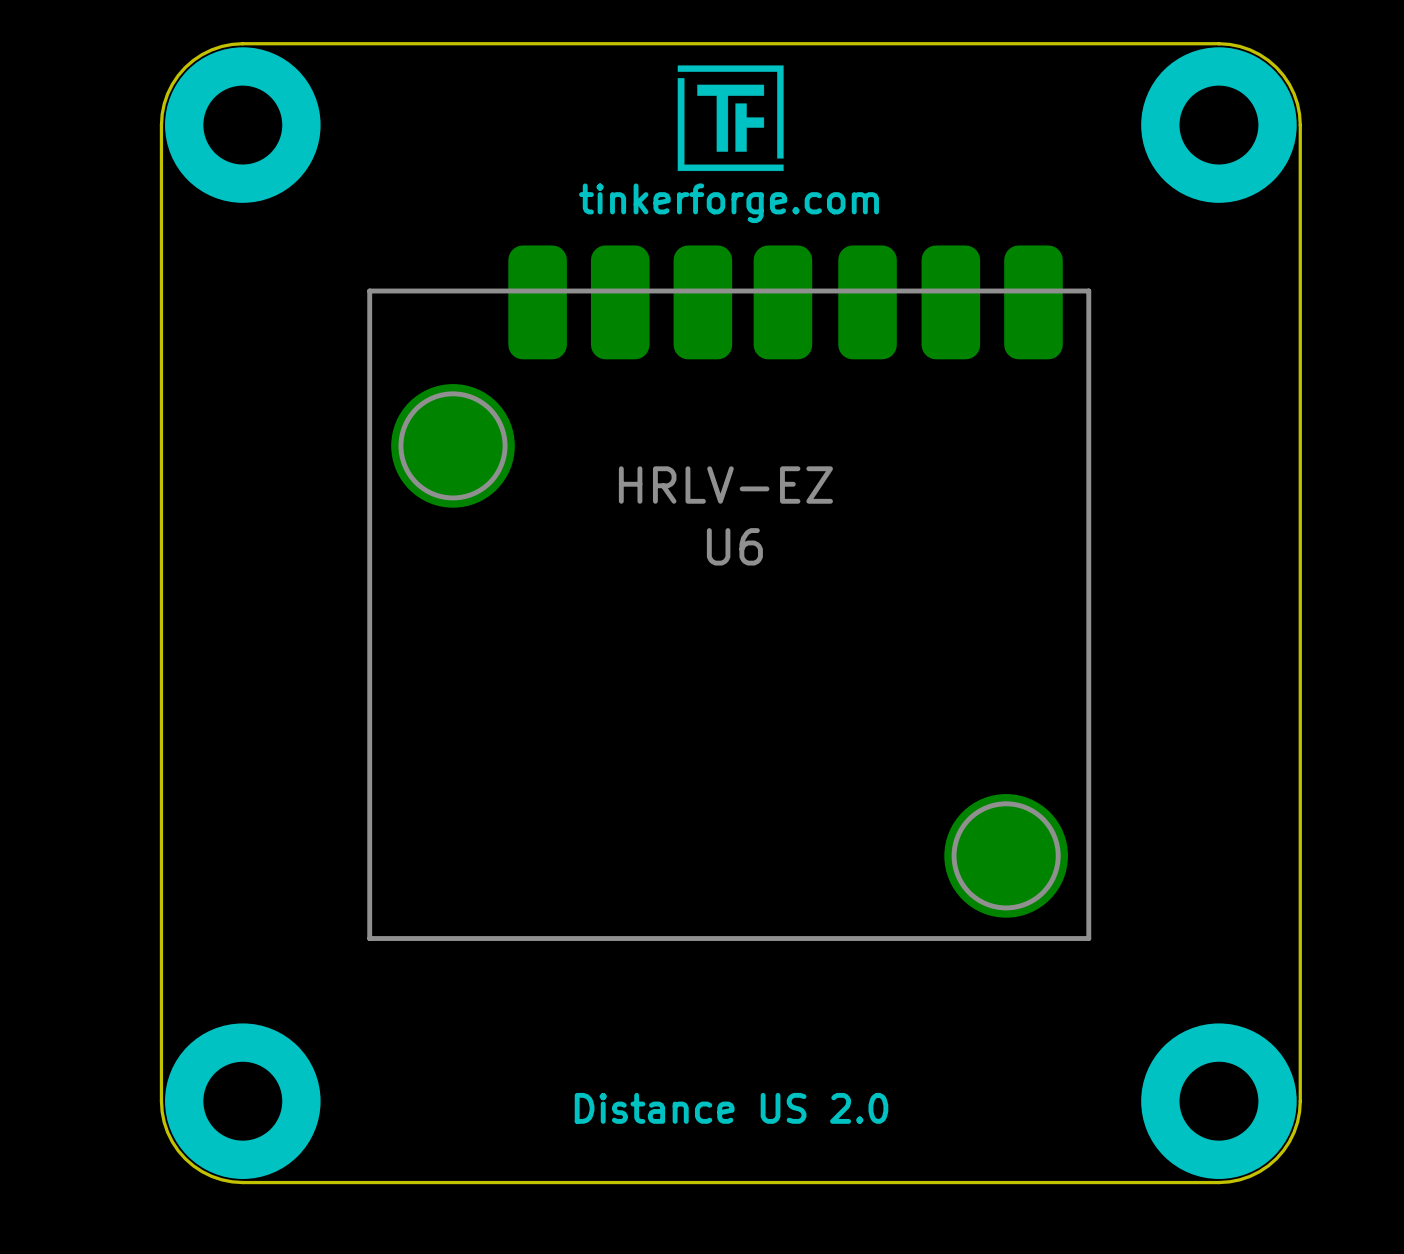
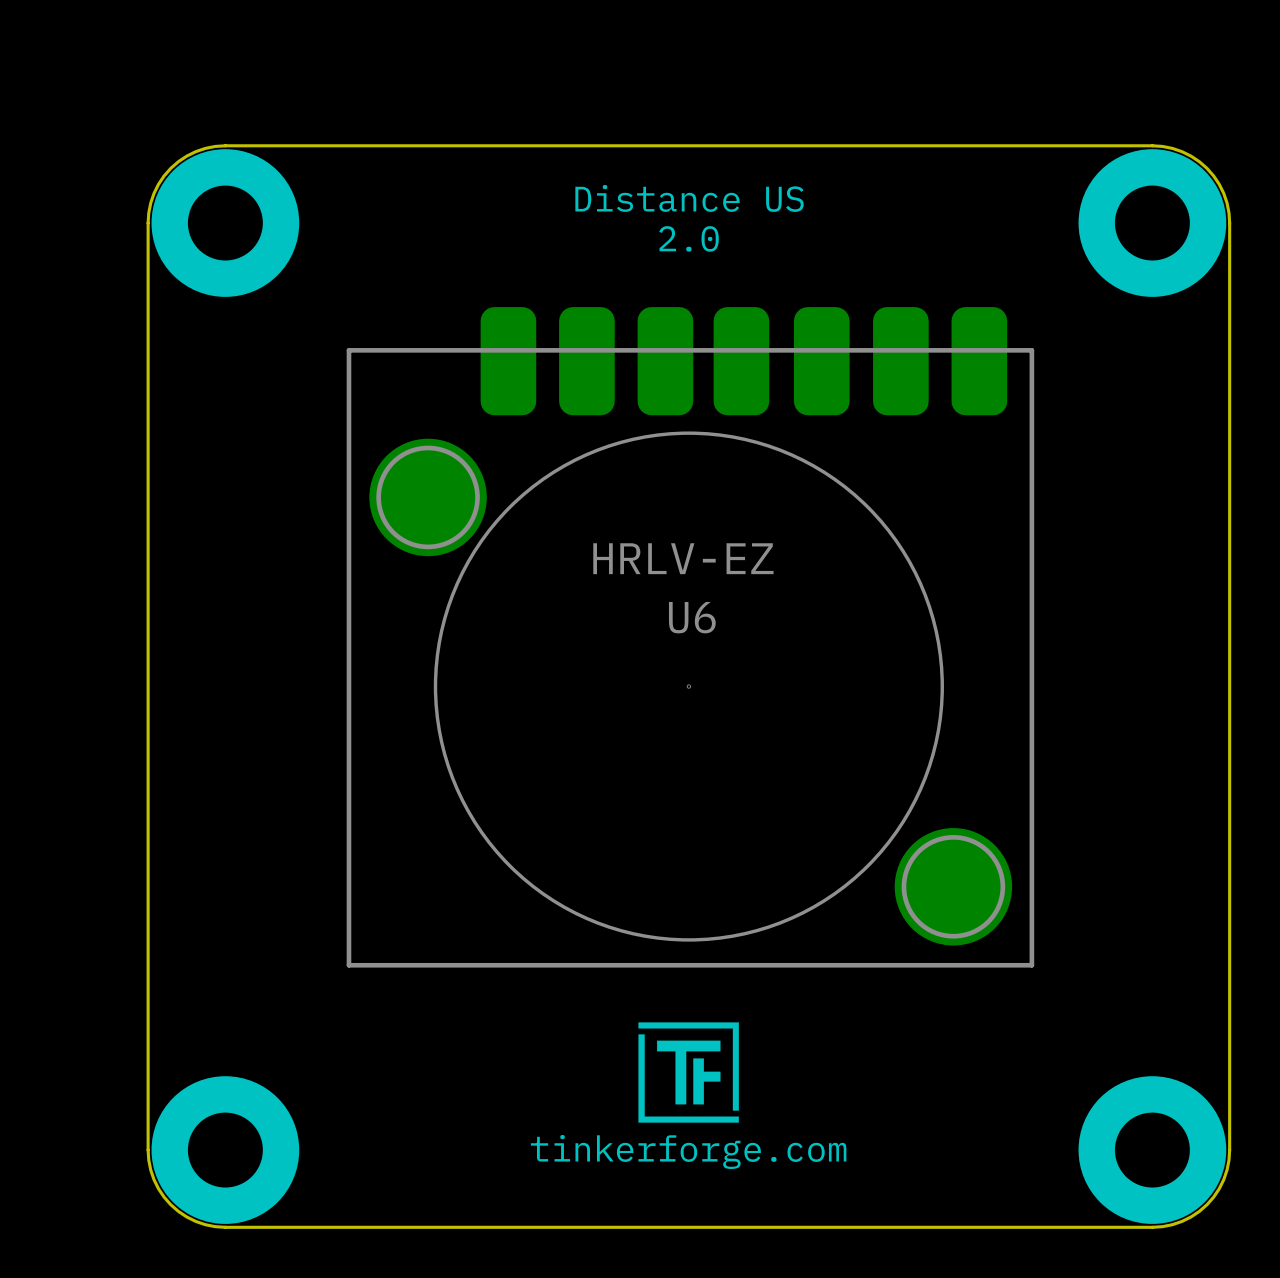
drawing: [677, 65, 784, 172] -> none
text: none -> Distance US (689, 198)
text: none -> 2.0 (689, 238)
text: tinkerforge.com (729, 203) -> none
U6 footprint: [367, 245, 1092, 941] -> [346, 307, 1035, 968]
drawing: none -> [638, 1022, 739, 1123]
text: Distance US 2.0 (731, 1108) -> tinkerforge.com (688, 1152)

